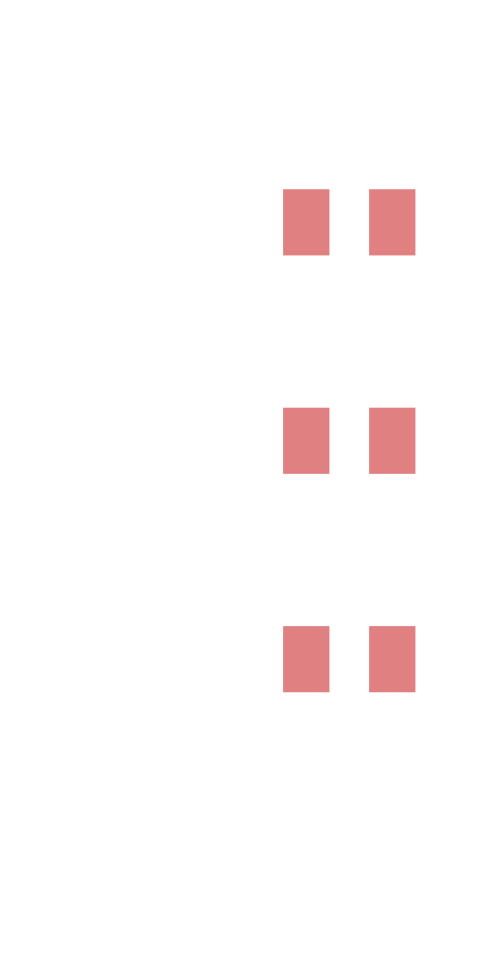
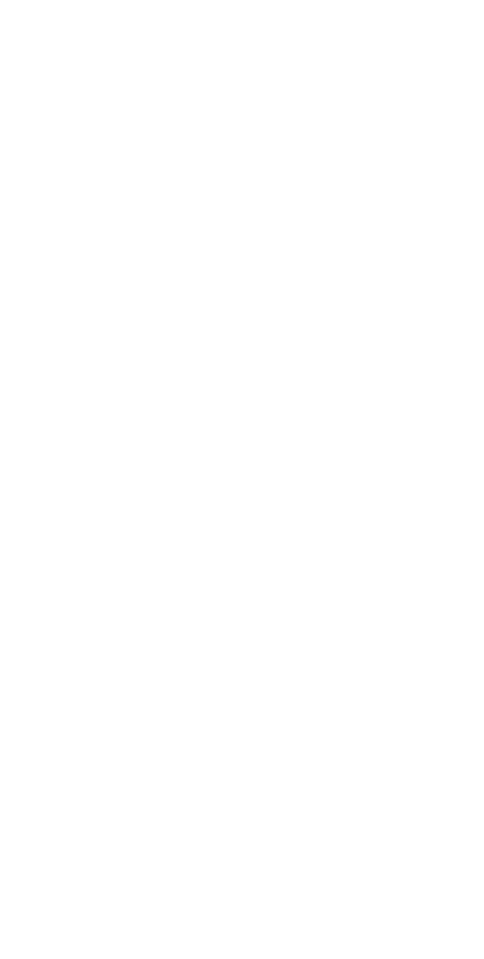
part: (349, 222) -> none
part: (349, 440) -> none
part: (349, 659) -> none

